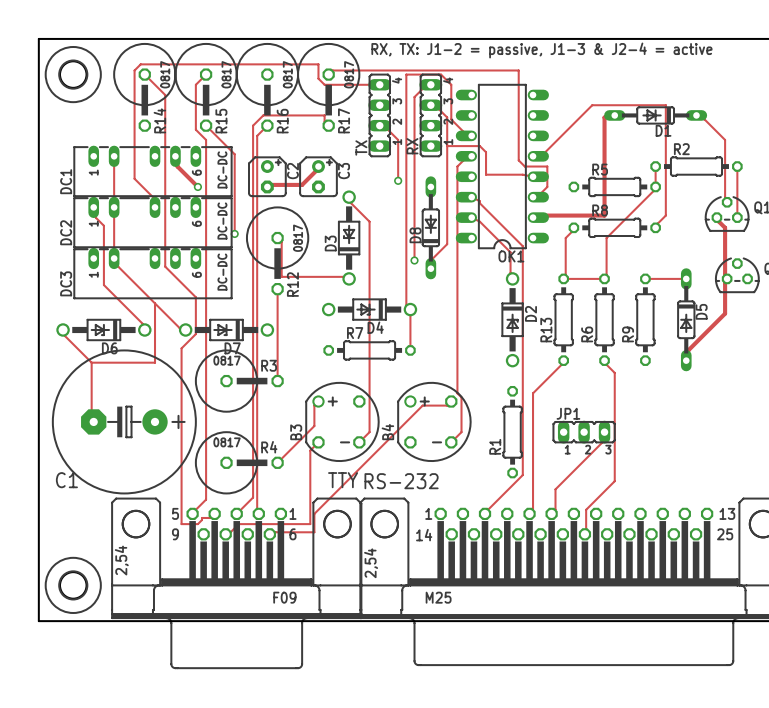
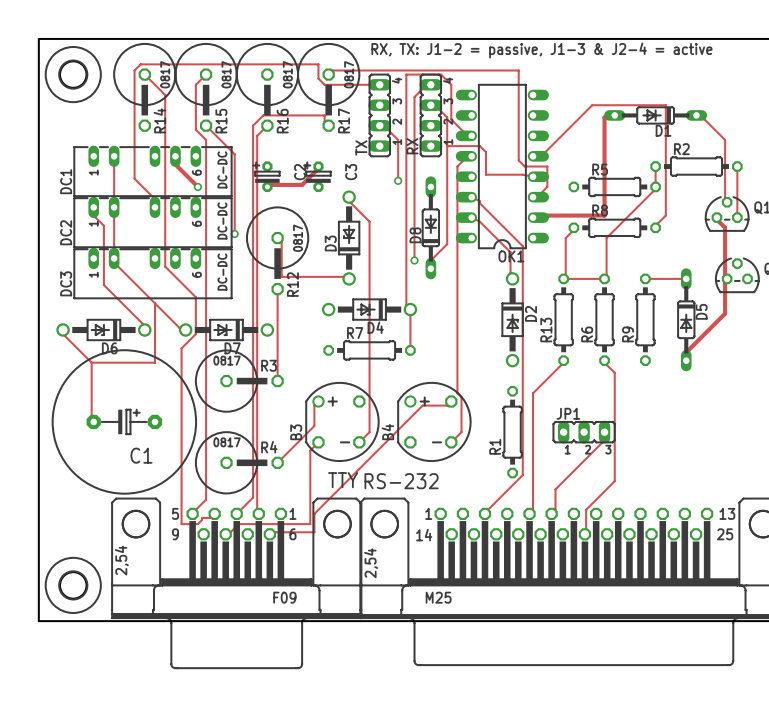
C2 footprint: [248, 156, 287, 197] -> [252, 161, 281, 193]
C3 footprint: [299, 156, 338, 197] -> [303, 161, 332, 193]
C1 footprint: [52, 349, 197, 495] -> [52, 349, 197, 495]
C1 name position: C1 (66, 480) -> C1 (141, 455)

